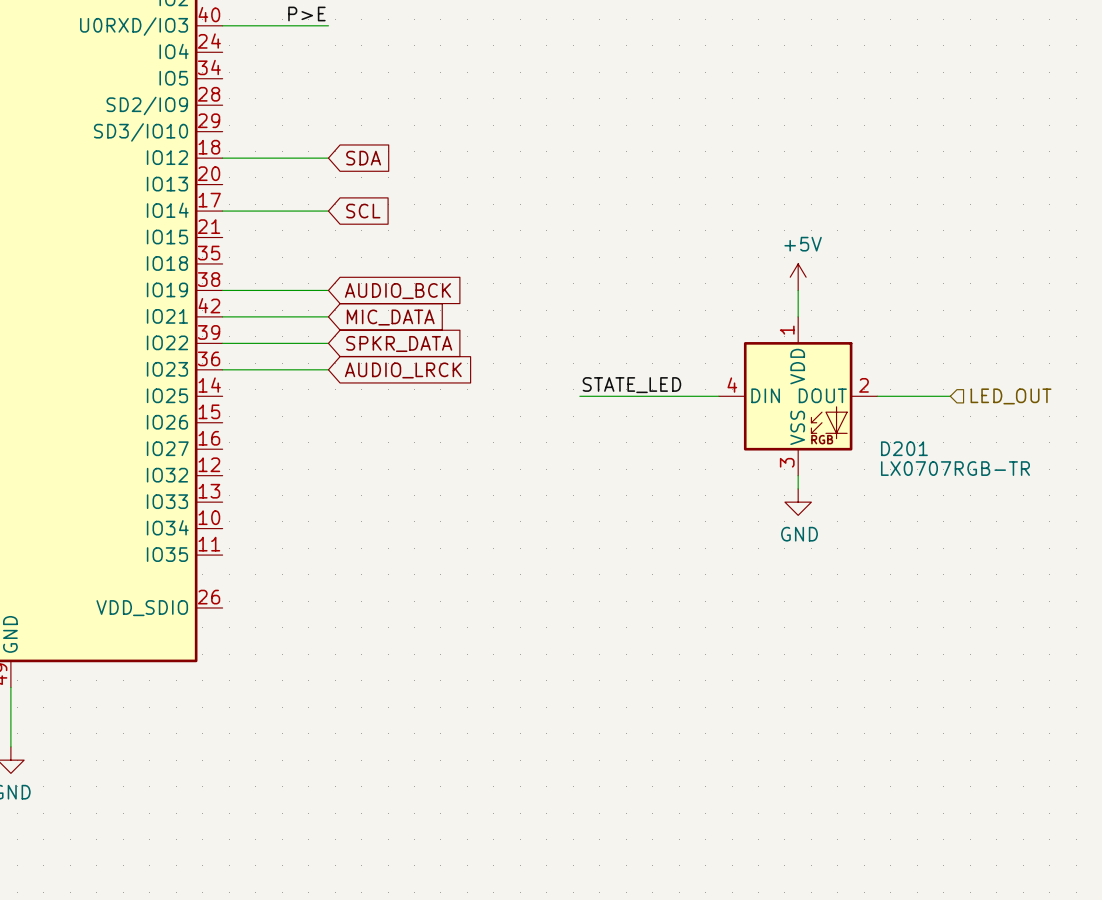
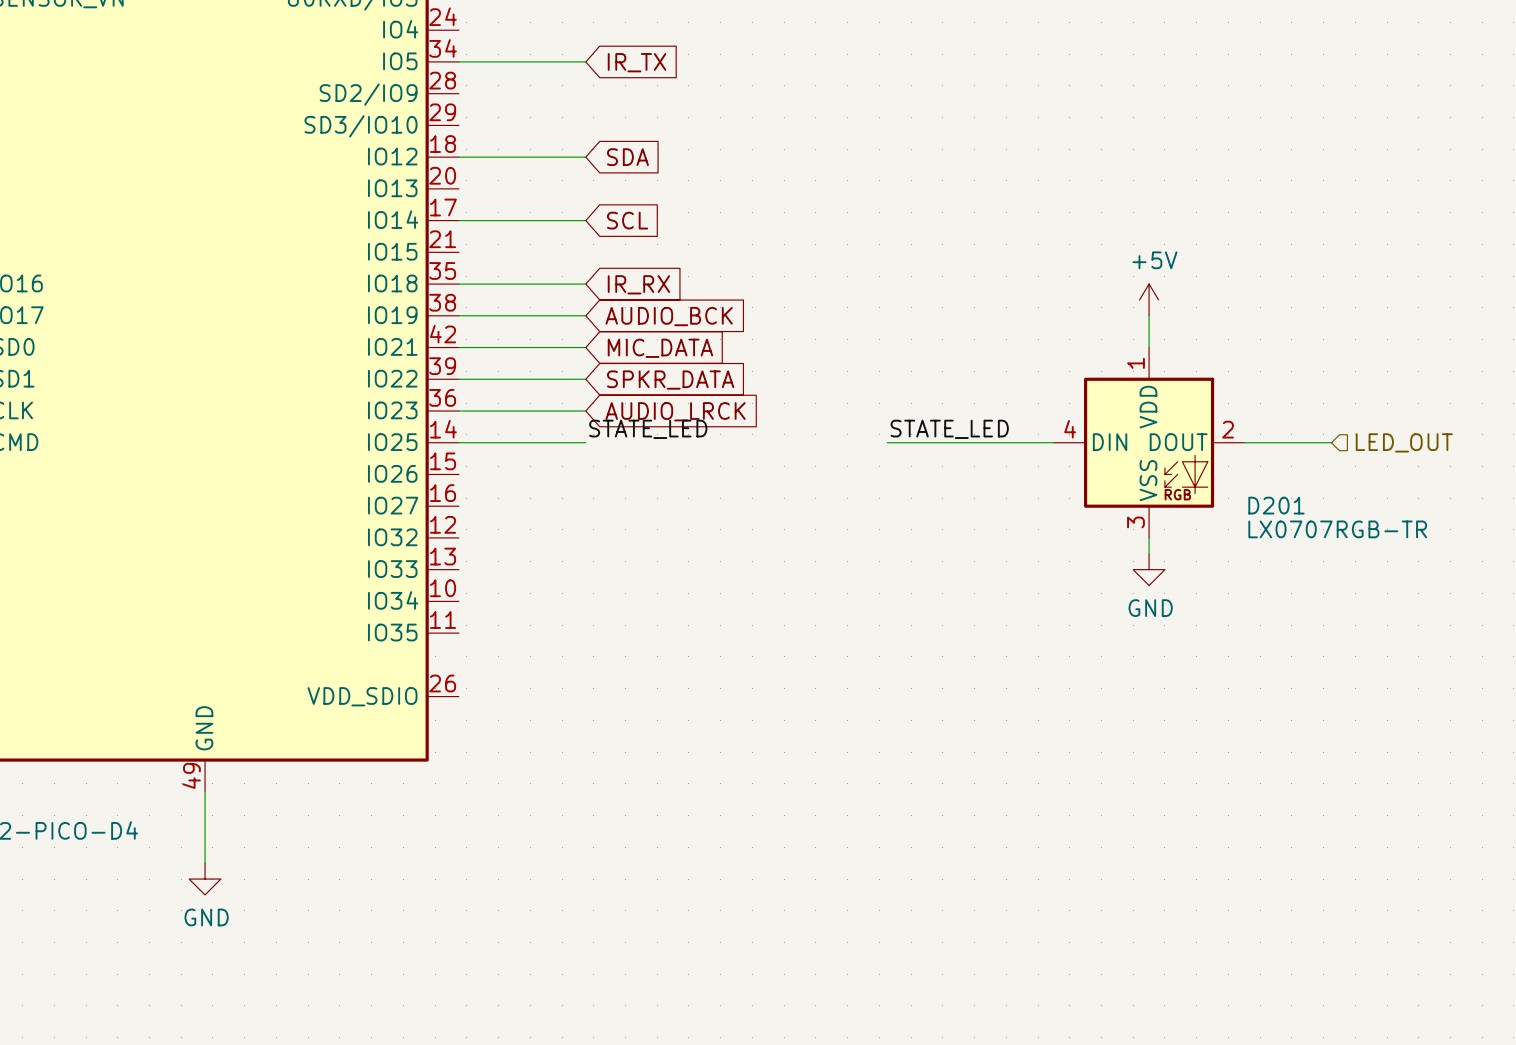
wire: none -> (458, 61) (585, 61)
global label: none -> IR_TX (637, 62)
wire: none -> (458, 284) (585, 284)
global label: none -> IR_RX (638, 284)
label: none -> STATE_LED (648, 429)
wire: none -> (458, 442) (585, 442)

